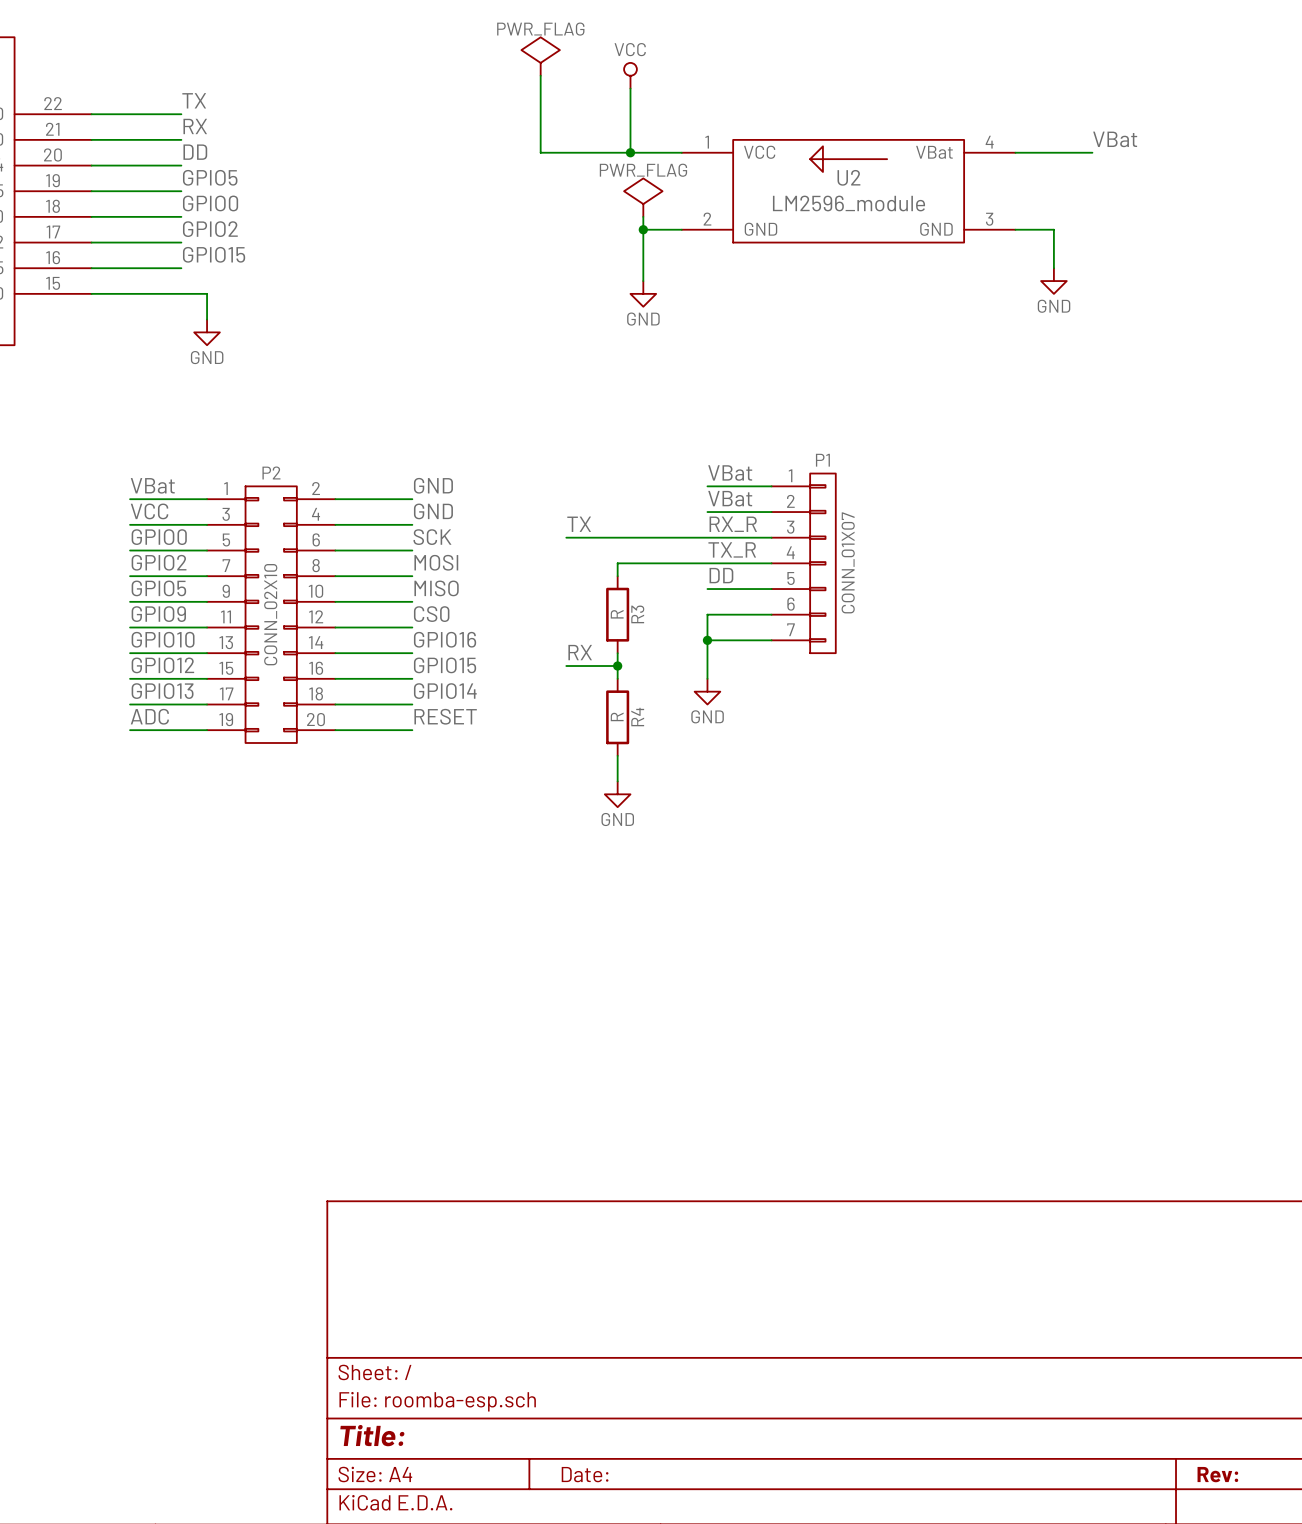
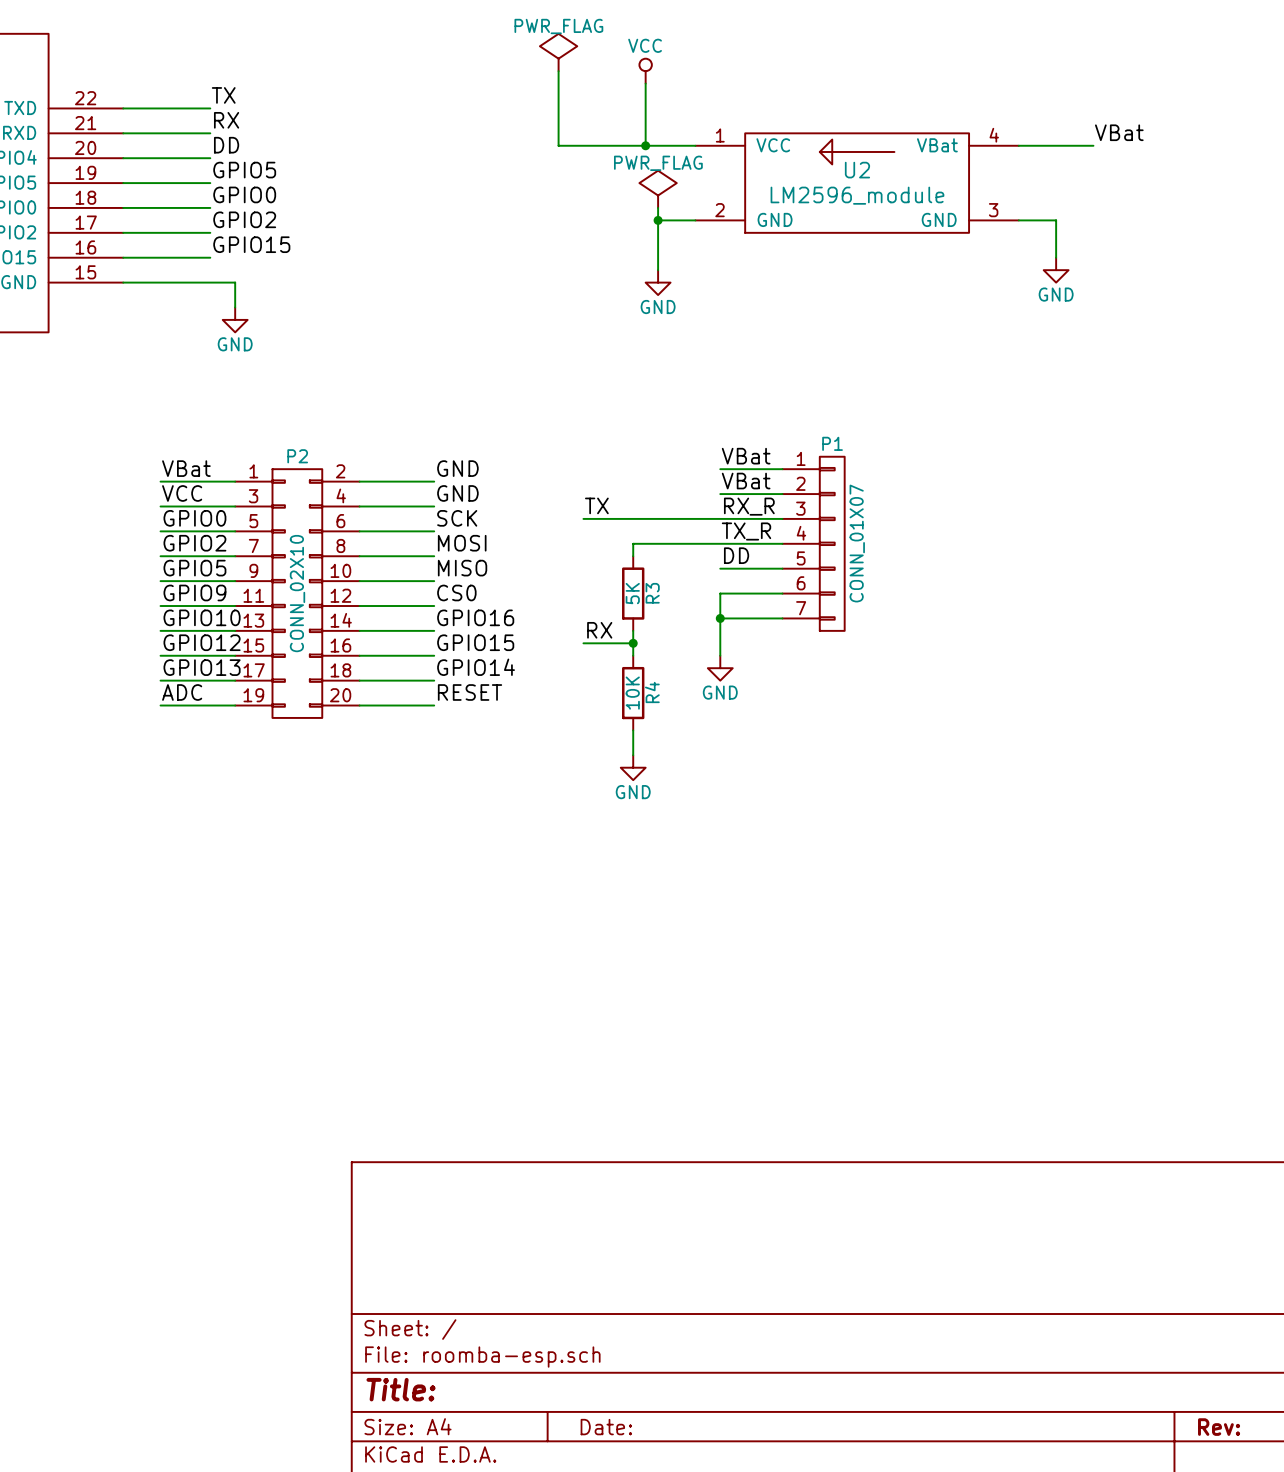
R3 value: R (617, 614) -> 5K (632, 593)
R4 value: R (617, 716) -> 10K (632, 693)

